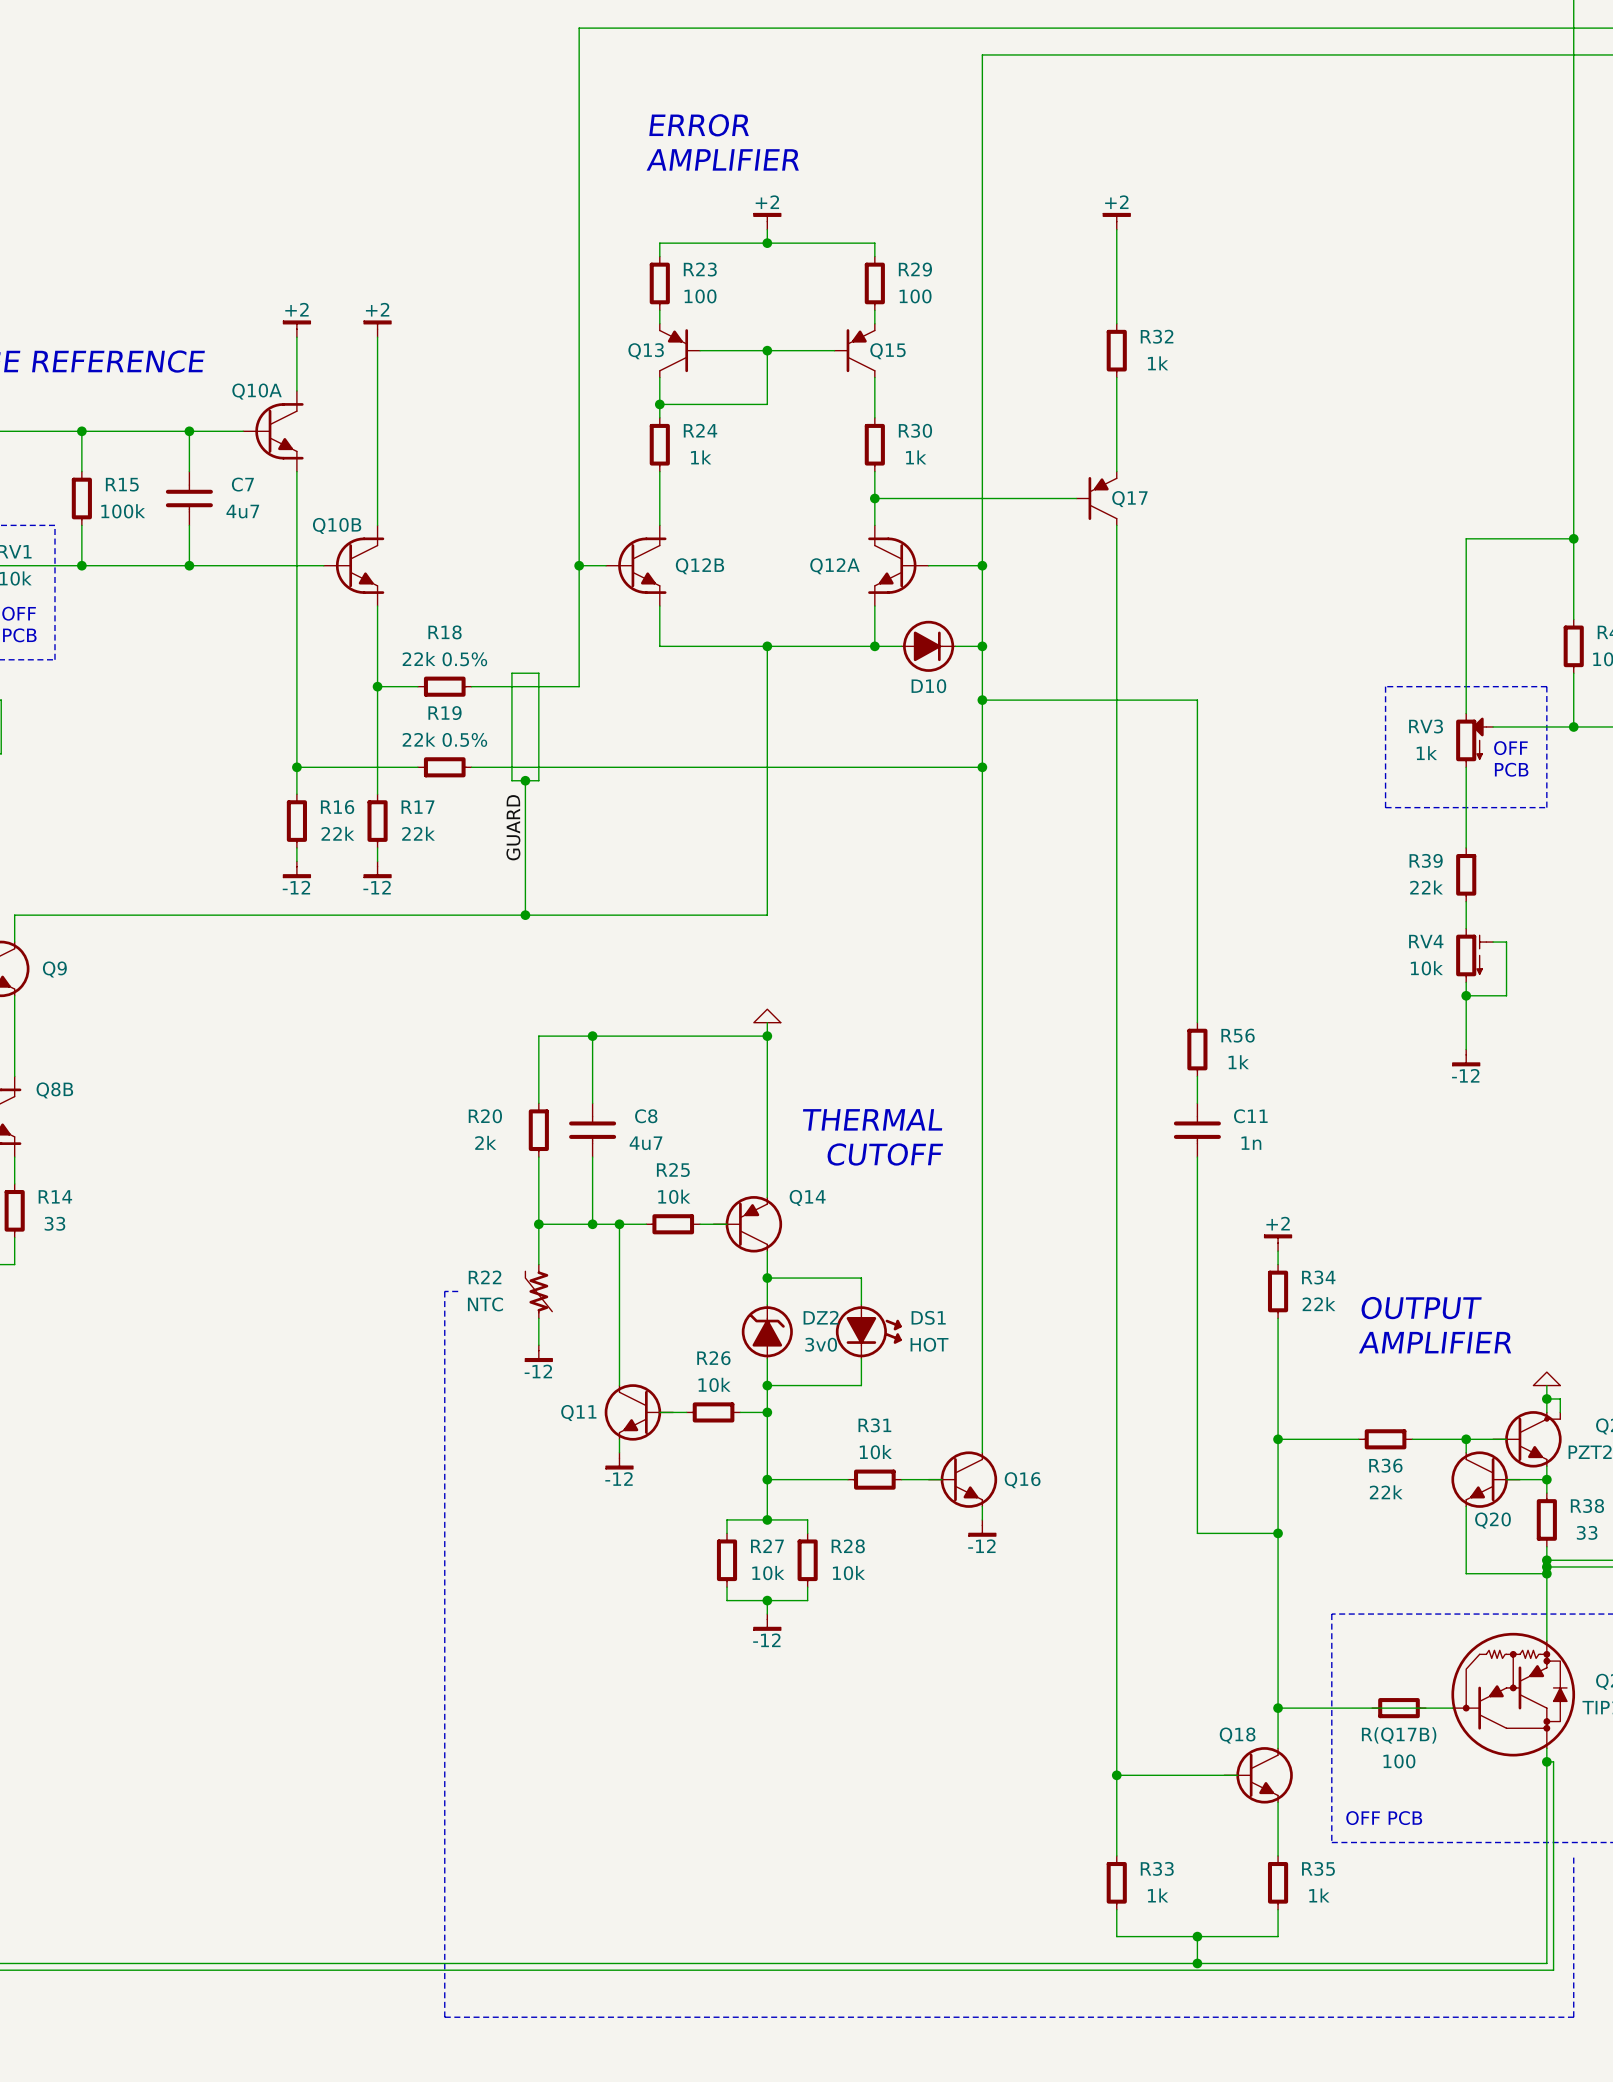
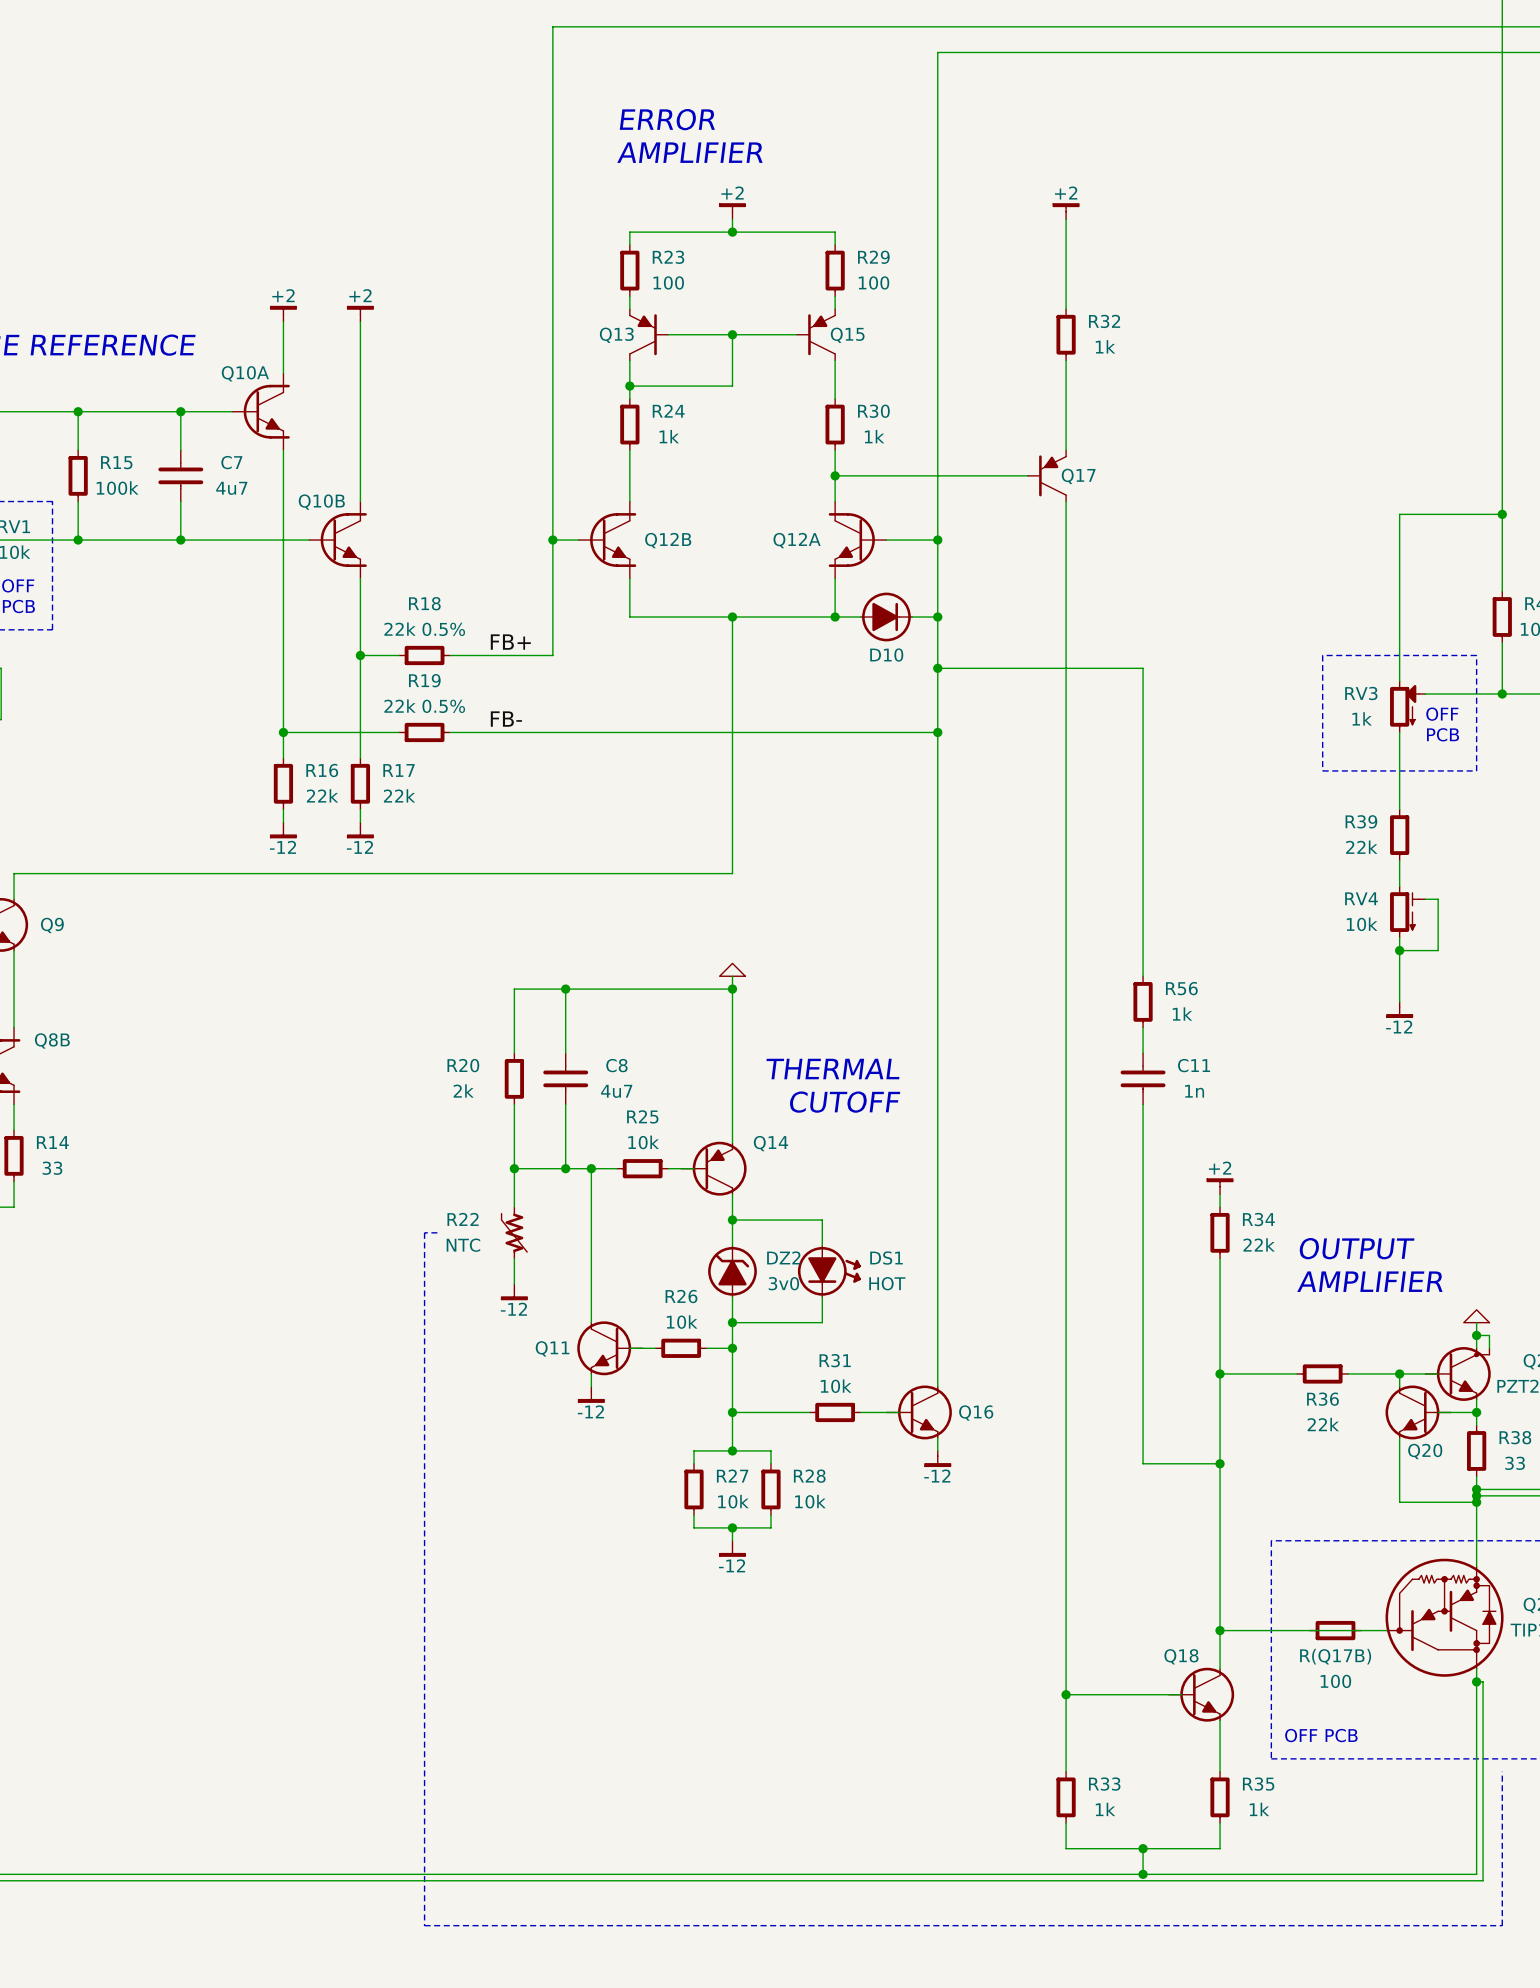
label: none -> FB+ (510, 642)
wire: (511, 673) (511, 780) (538, 780) (538, 673) (511, 673) -> none
label: none -> FB- (506, 719)
wire: (525, 780) (525, 915) -> none
junction: (525, 780) -> none
label: GUARD (513, 827) -> none
junction: (525, 915) -> none

